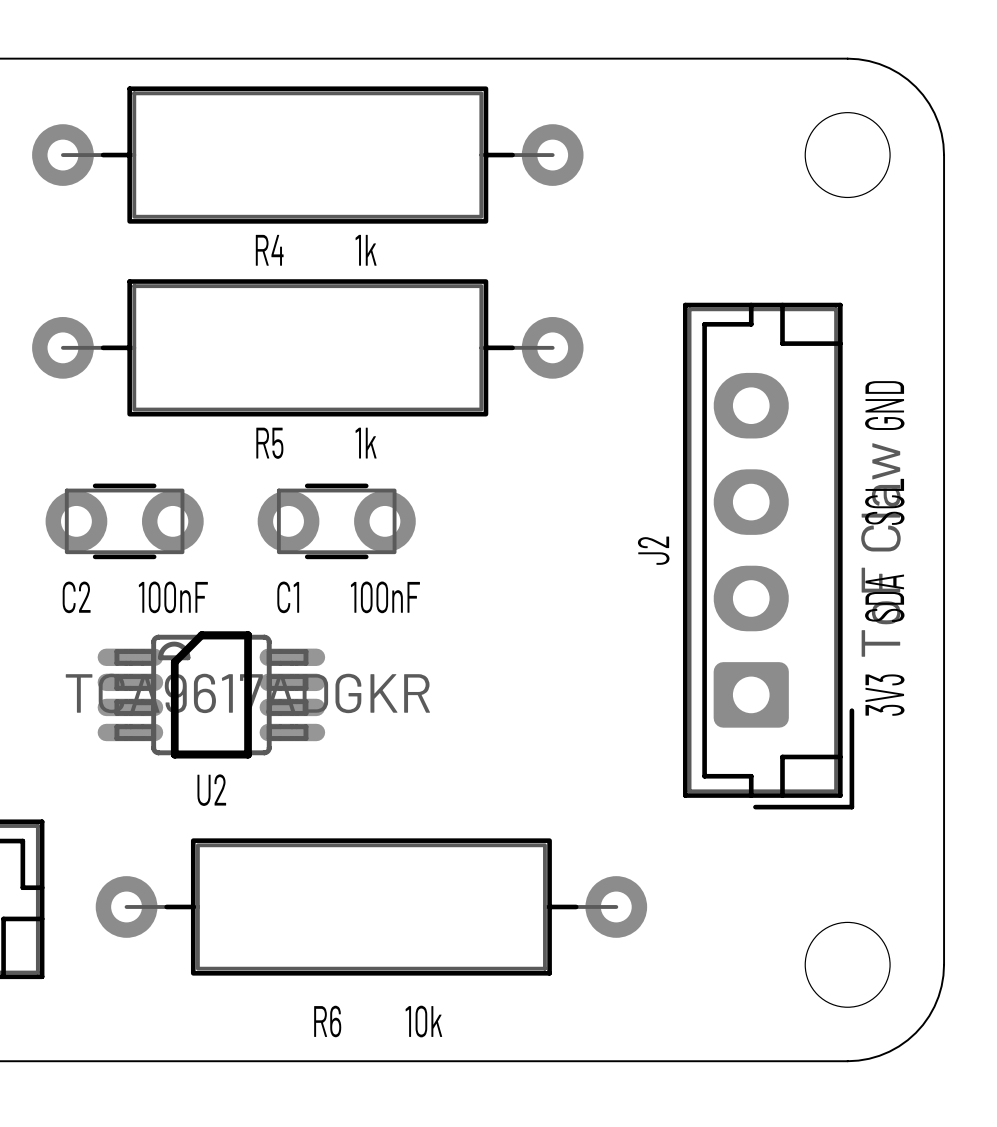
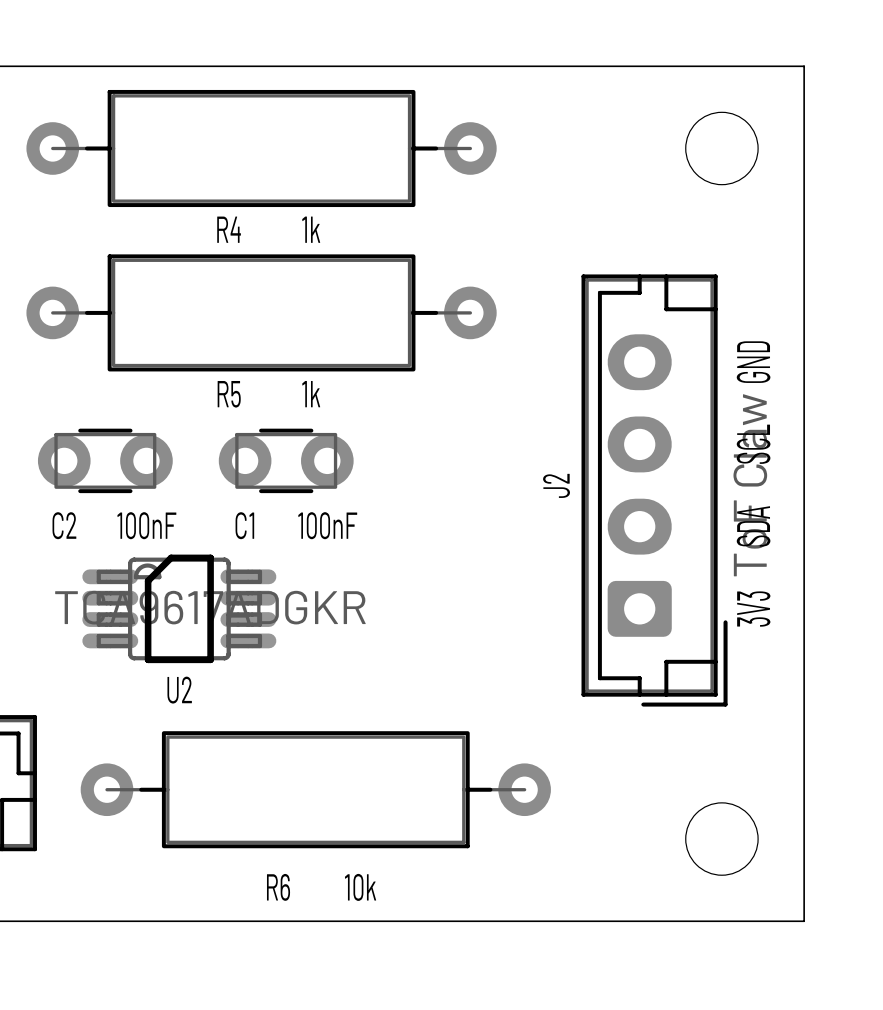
board edge: (847, 58) (879, 64) (898, 73) (915, 86) (934, 113) (941, 133) (944, 155) -> (721, 66) (804, 66) (804, 148)
board edge: (944, 964) (938, 996) (929, 1016) (915, 1032) (898, 1046) (879, 1055) (847, 1061) -> (804, 839) (804, 921) (721, 921)

